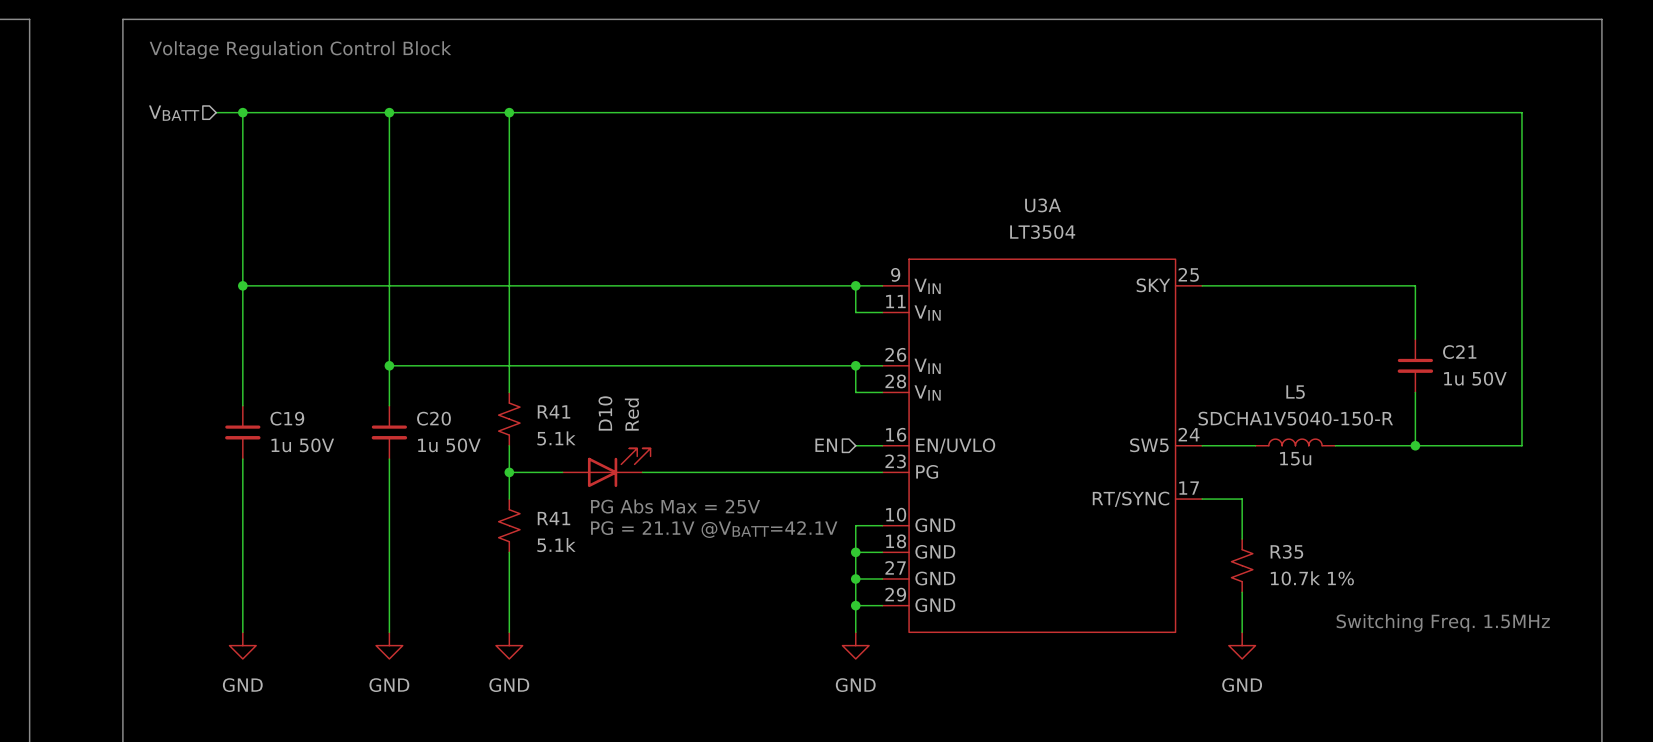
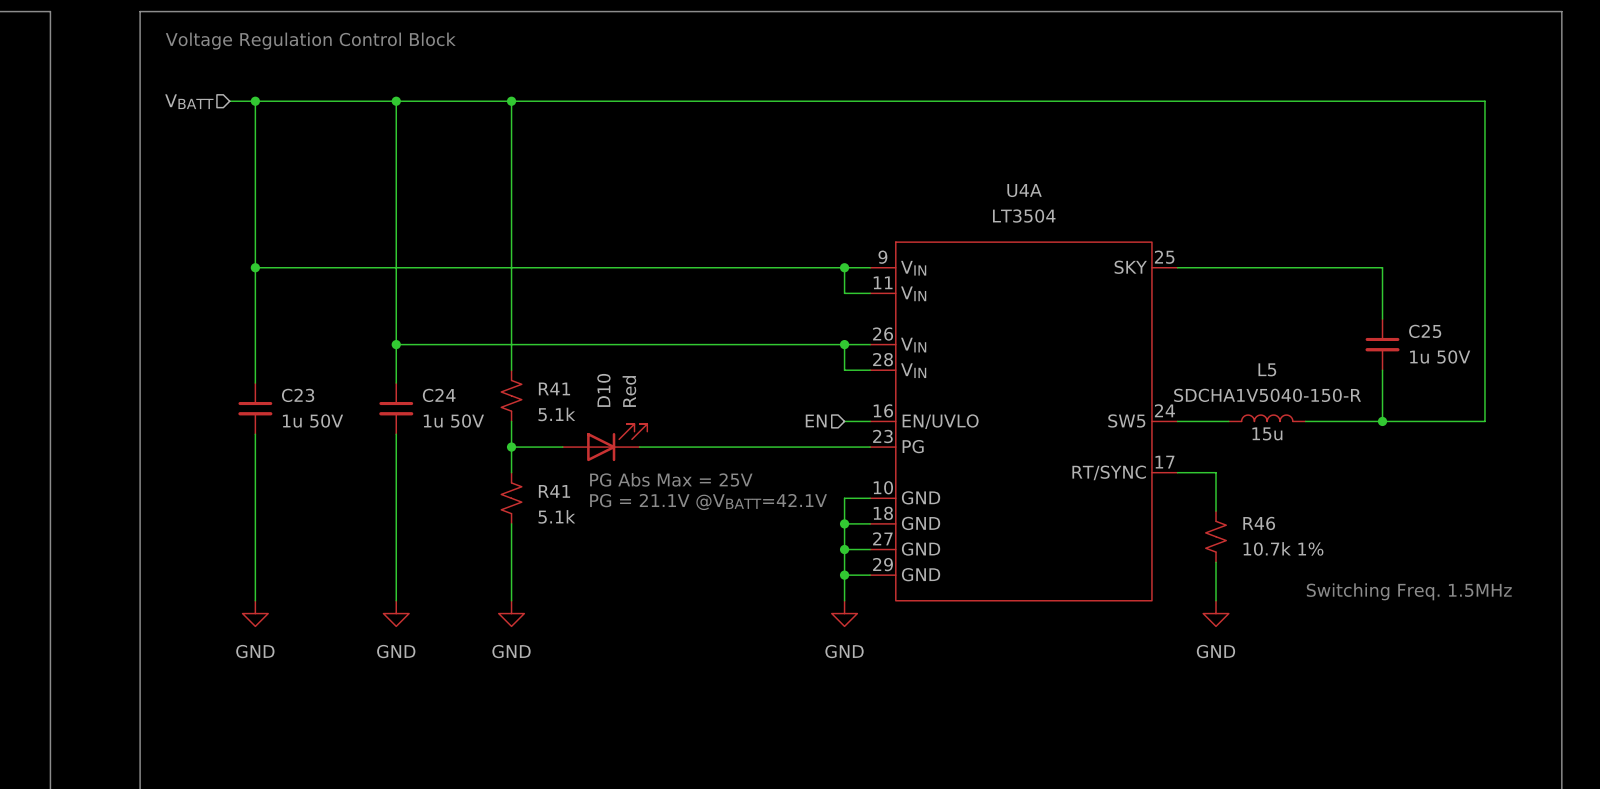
U3A name: U3A (1043, 205) -> U4A (1024, 190)
C21 name: C21 (1459, 352) -> C25 (1425, 331)
C19 name: C19 (287, 418) -> C23 (298, 395)
C20 name: C20 (433, 418) -> C24 (439, 395)
R35 name: R35 (1286, 551) -> R46 (1259, 523)

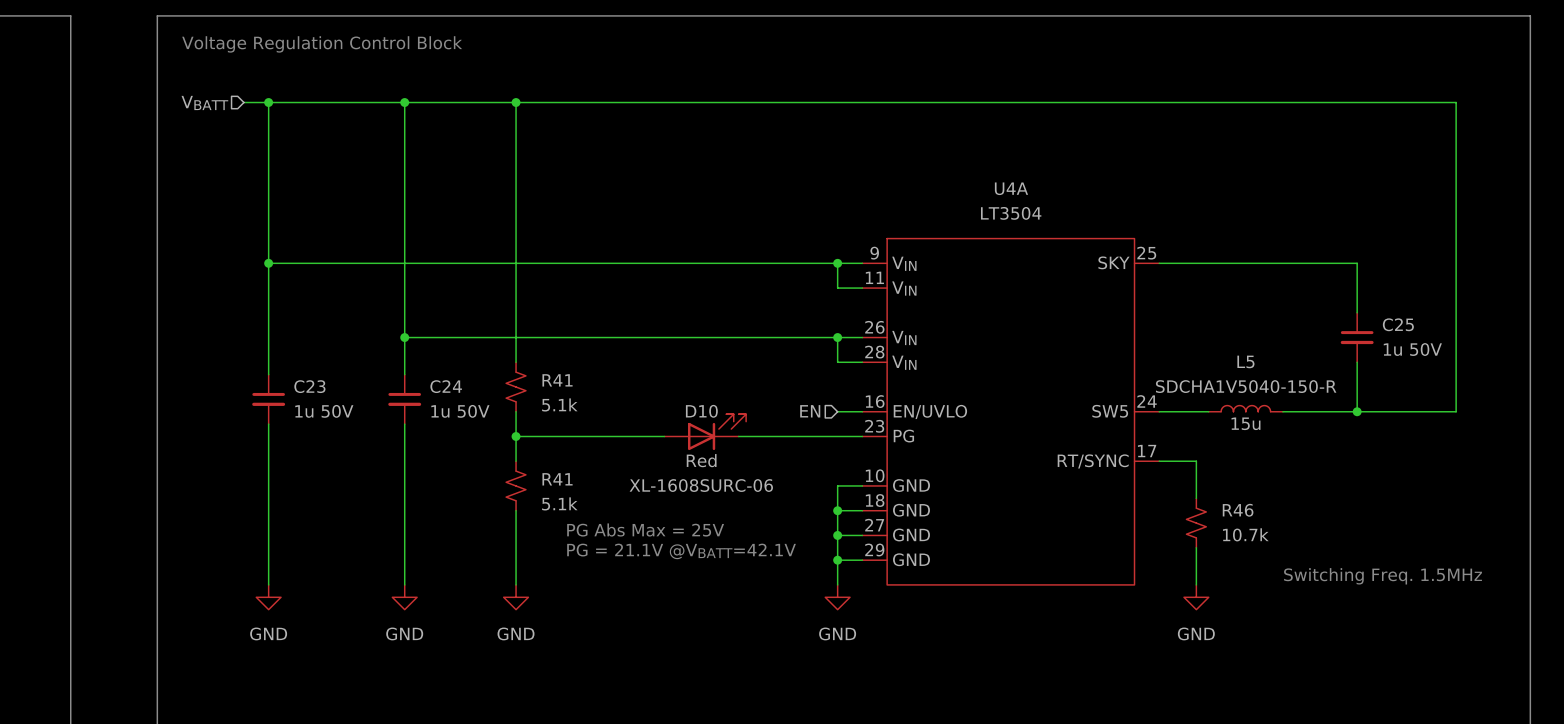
D10 name rotation: 0° (603, 390) -> 90° clockwise (701, 411)
D10 value: Red (629, 391) -> XL-1608SURC-06 (701, 485)
D10 position: (605, 442) -> (705, 432)
D10 text: none -> Red (701, 460)
text position: PG Abs Max = 25V (671, 479) -> PG Abs Max = 25V (645, 530)
text position: PG = 21.1V @VBATT=42.1V (708, 502) -> PG = 21.1V @VBATT=42.1V (681, 551)
R46 value: 10.7k 1% (1283, 548) -> 10.7k (1245, 534)

